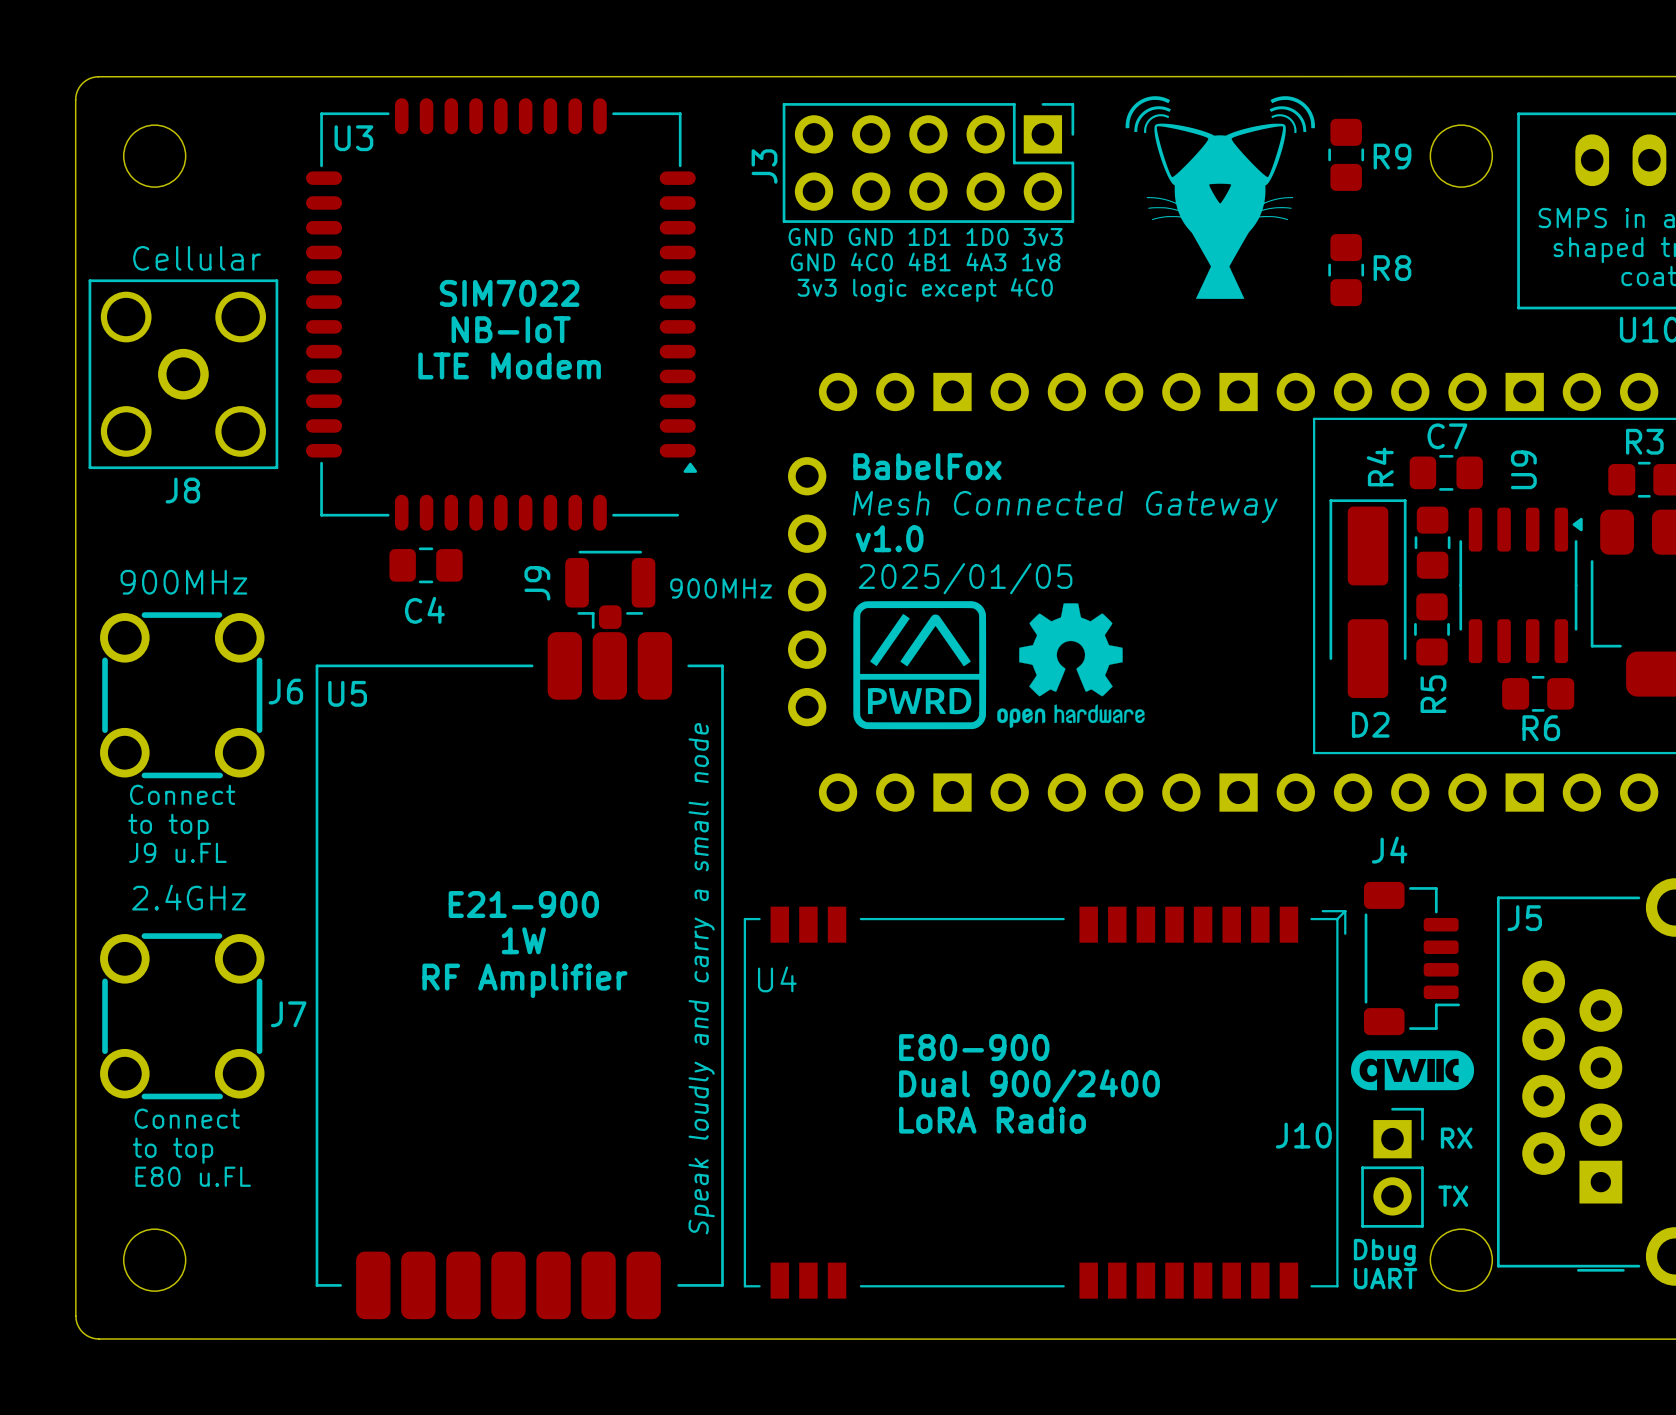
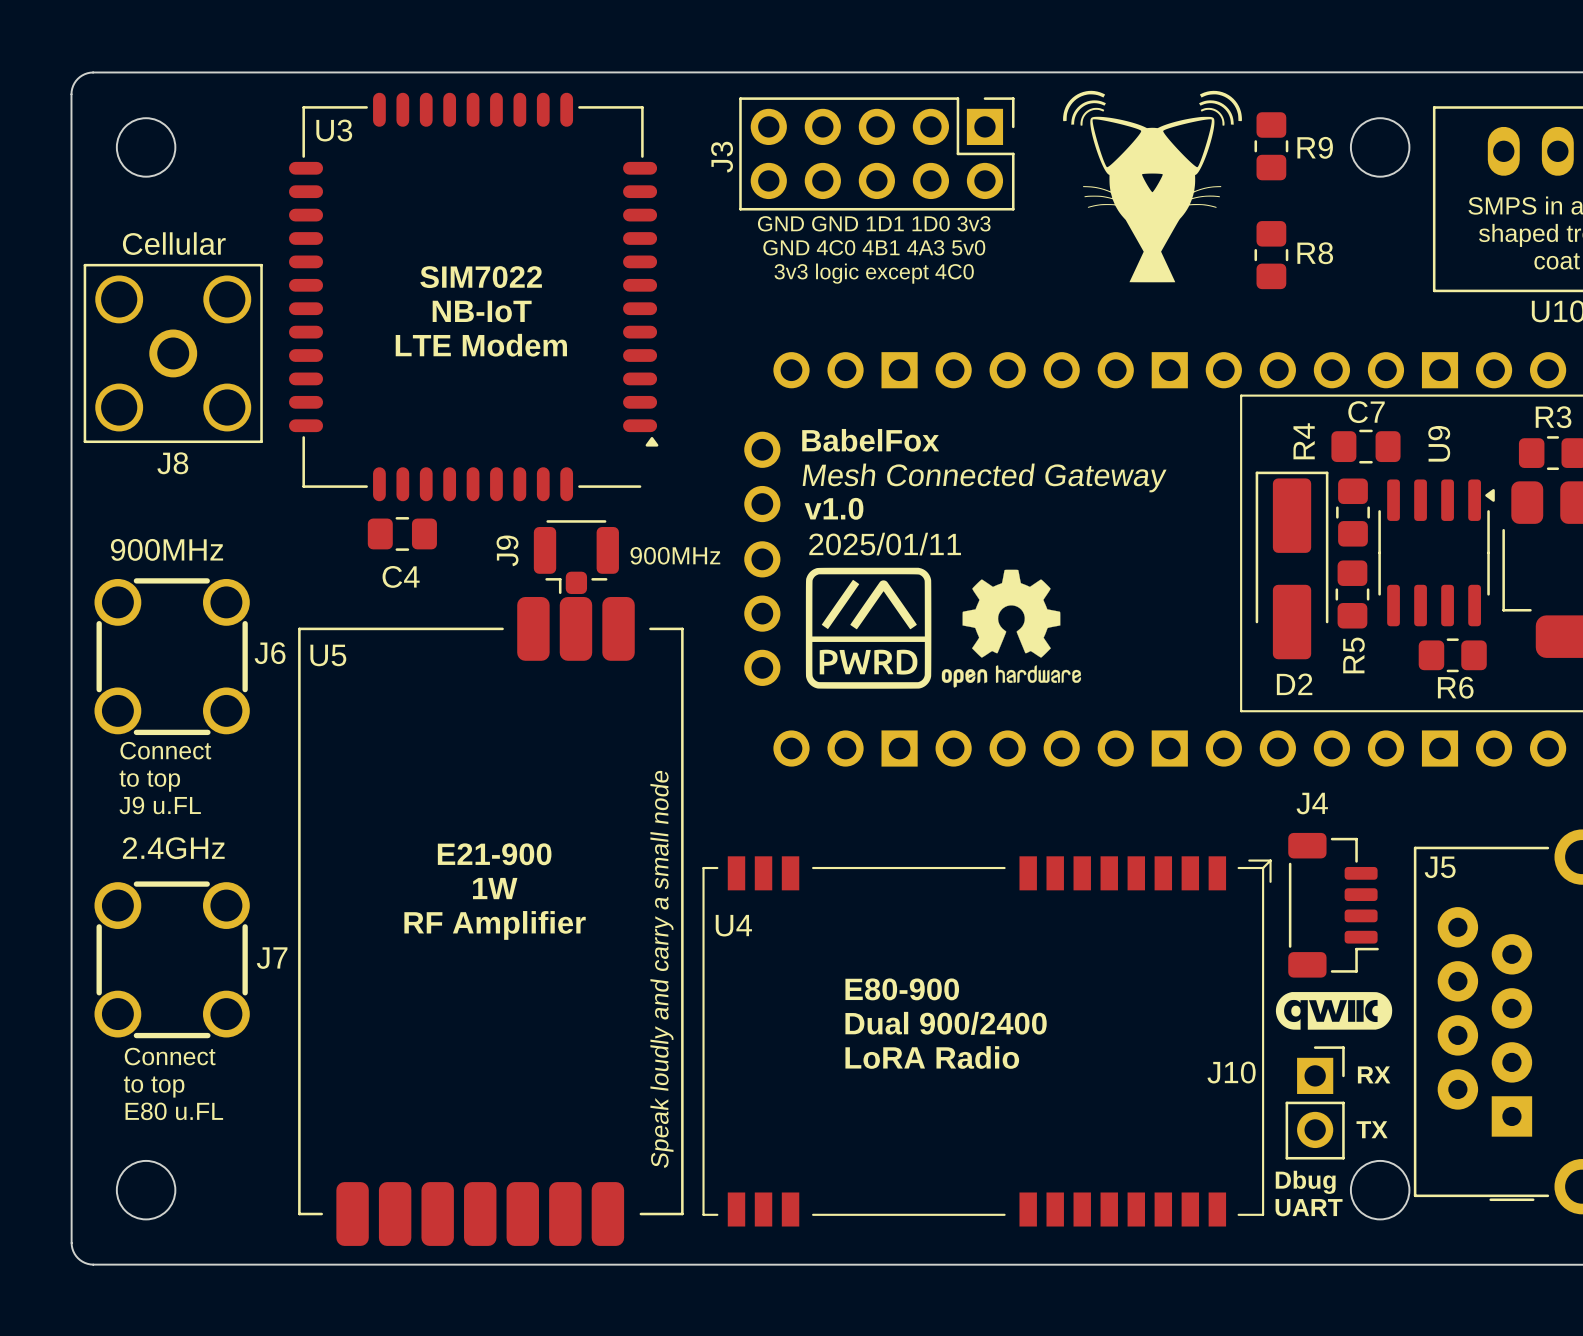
text: GND 4C0 4B1 4A3 1v8 (925, 261) -> GND 4C0 4B1 4A3 5v0 (874, 247)
text: 2025/01/05 (965, 578) -> 2025/01/11 (885, 544)

